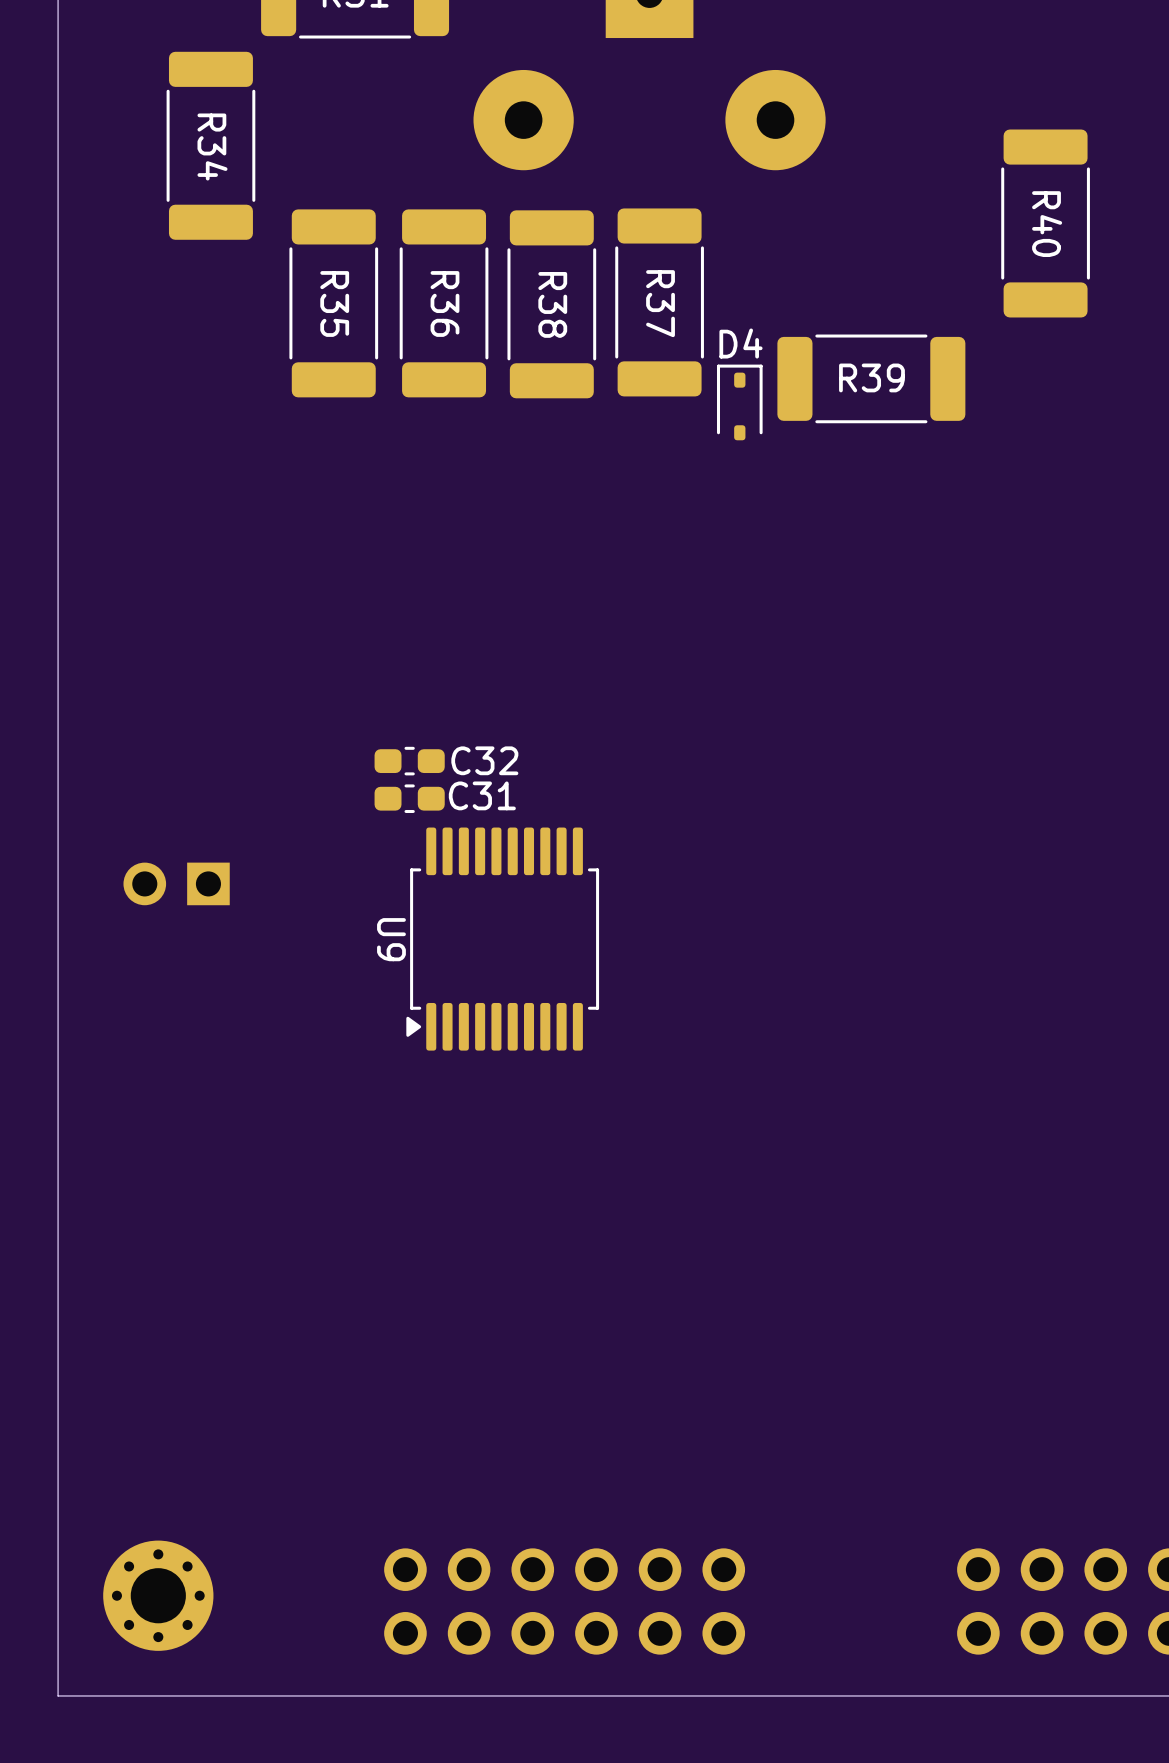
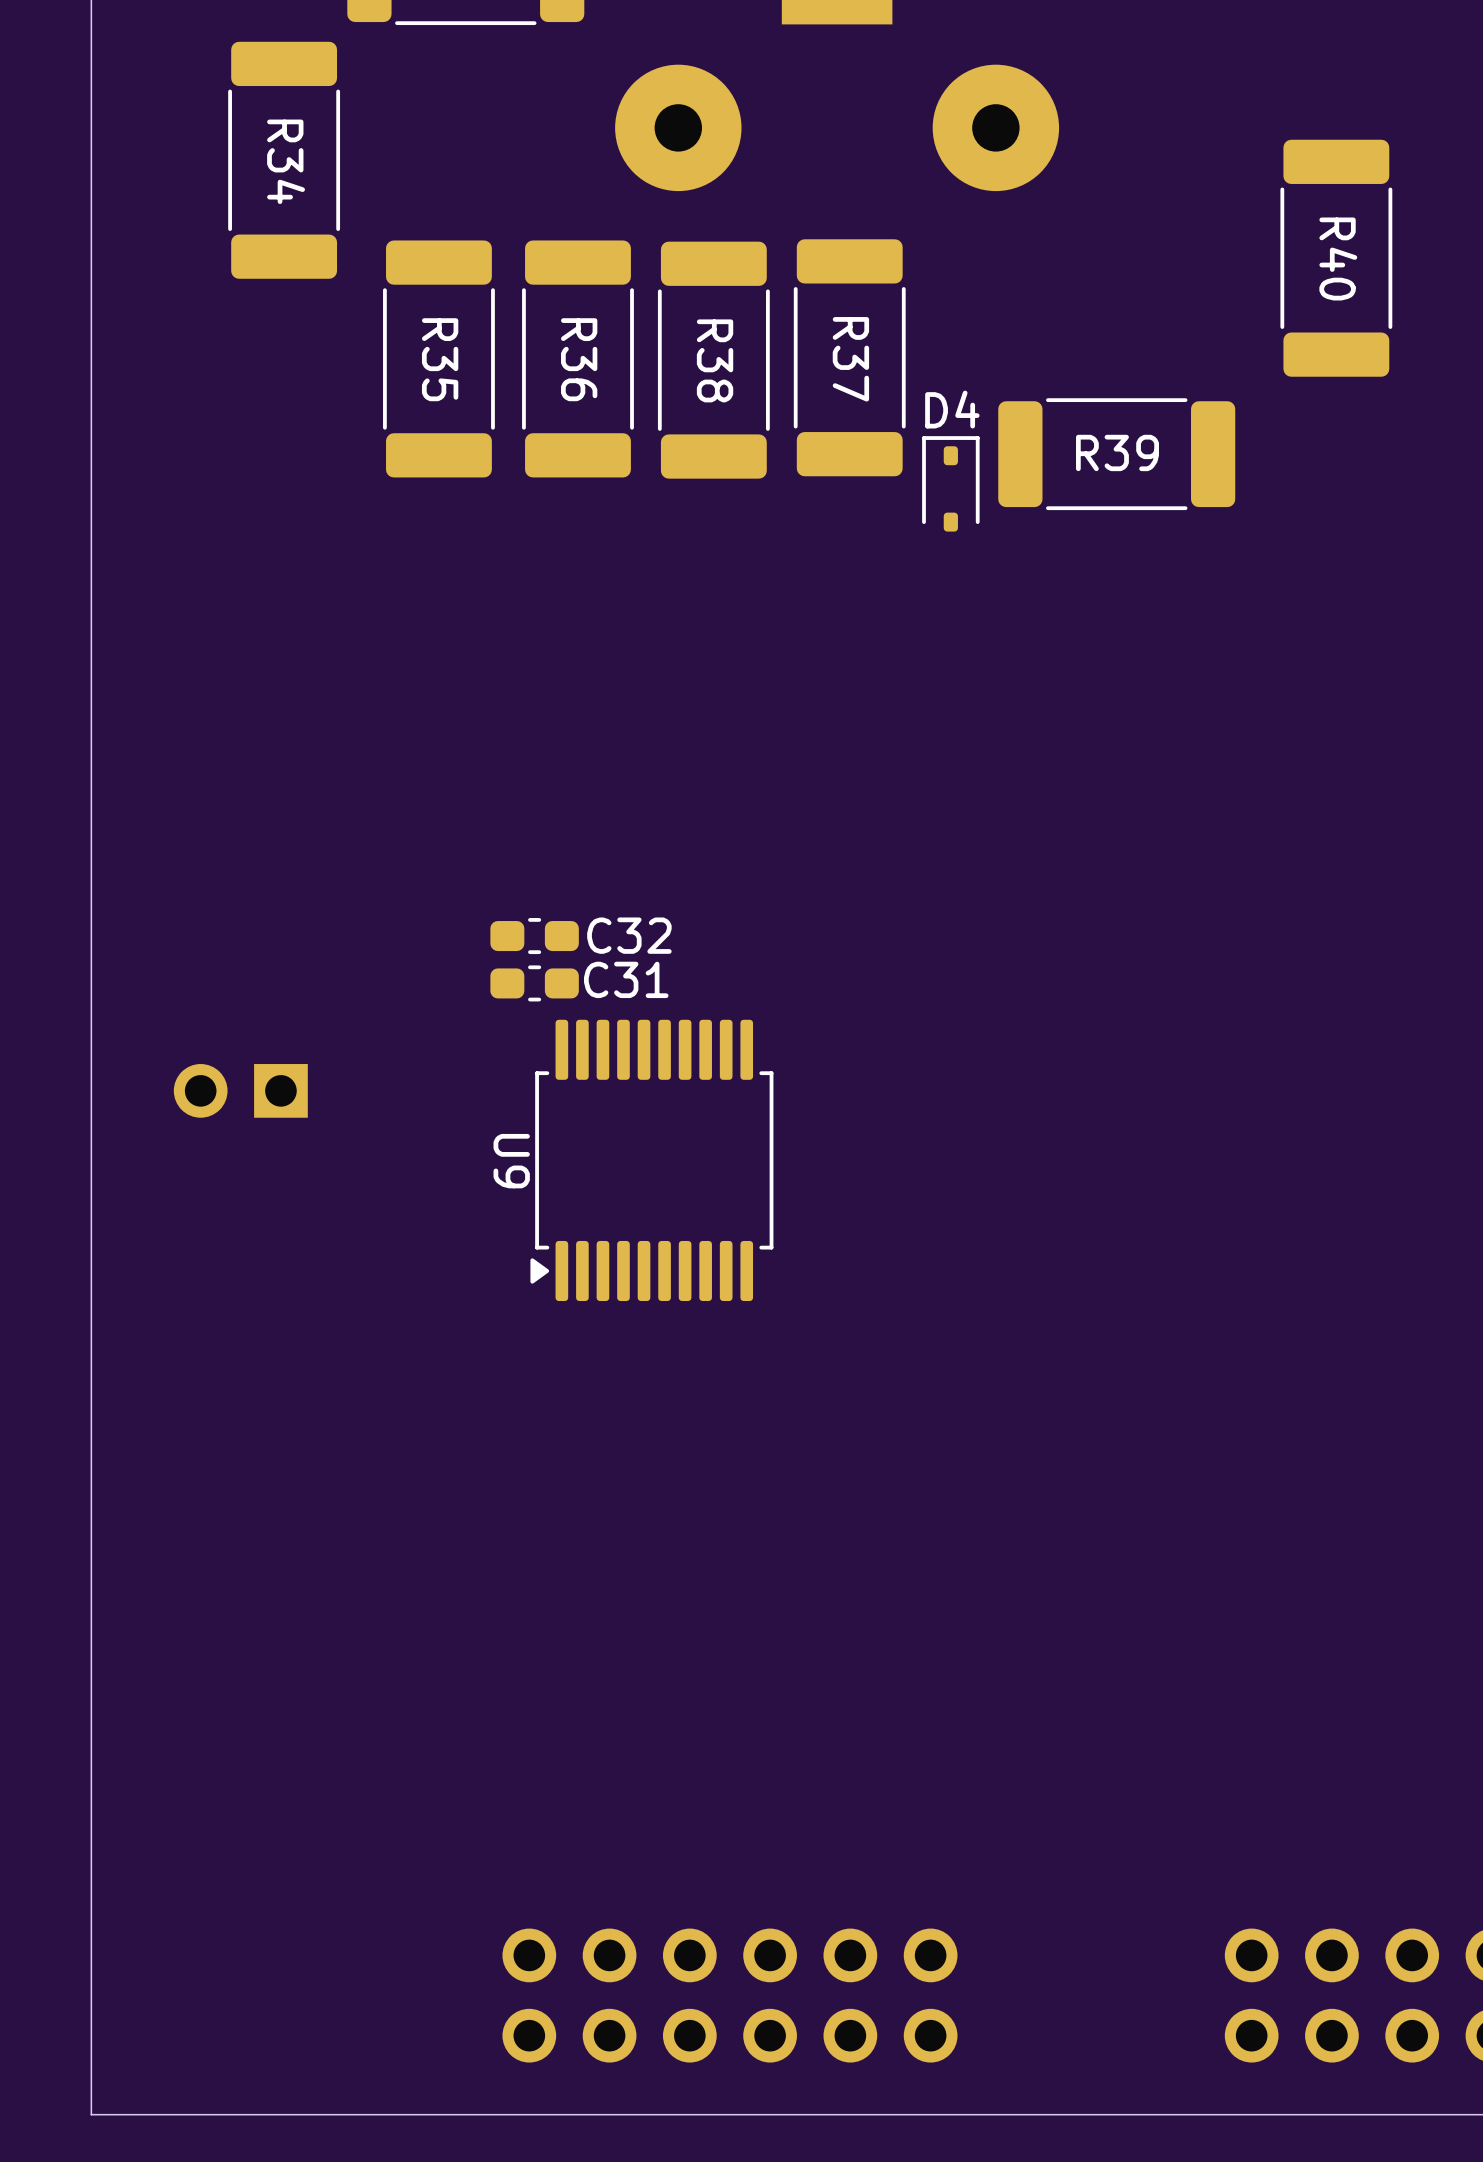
part: (158, 1595) -> none

